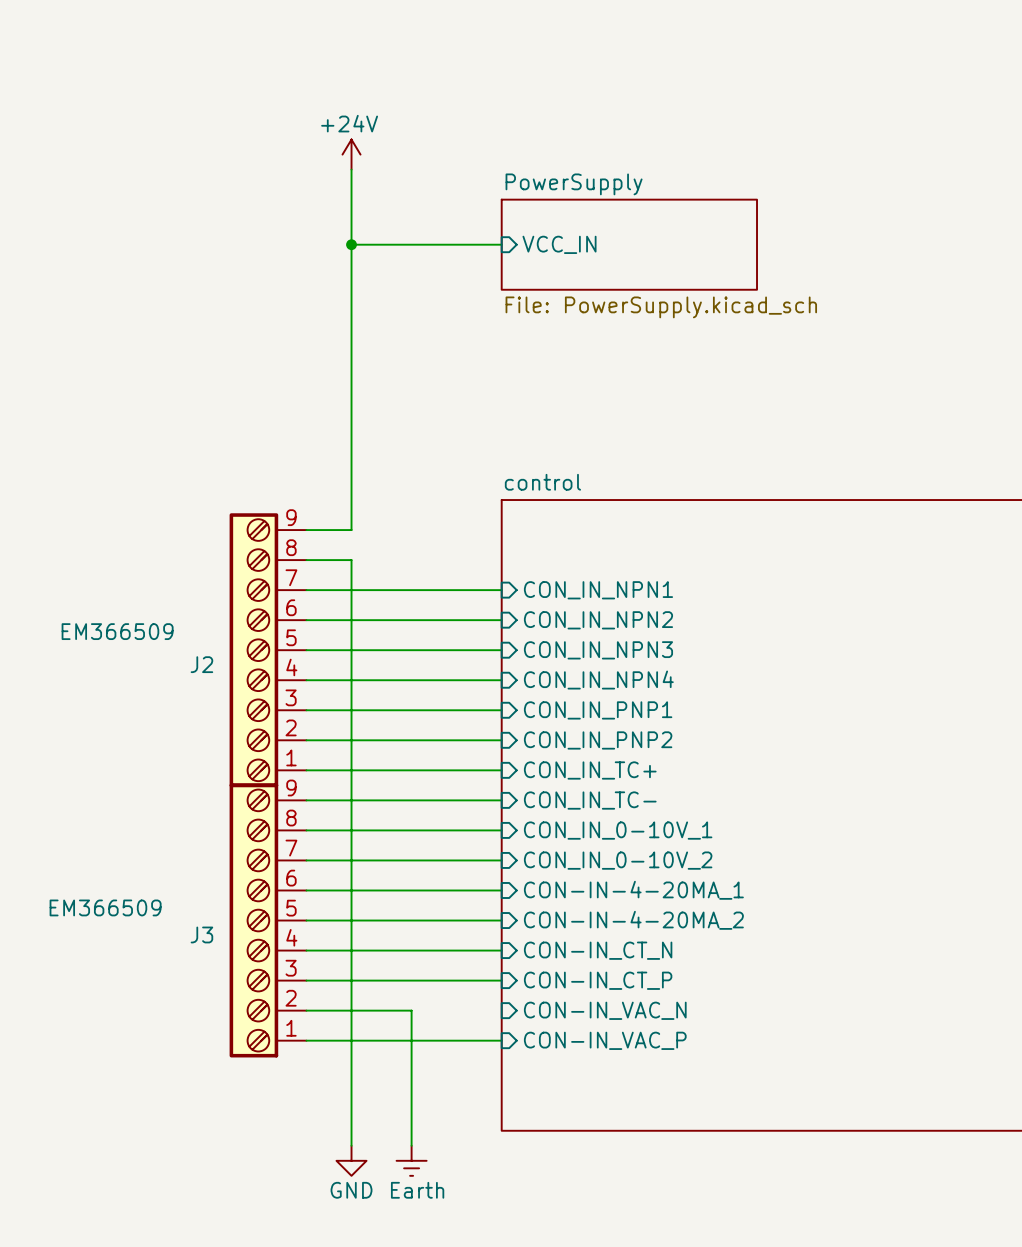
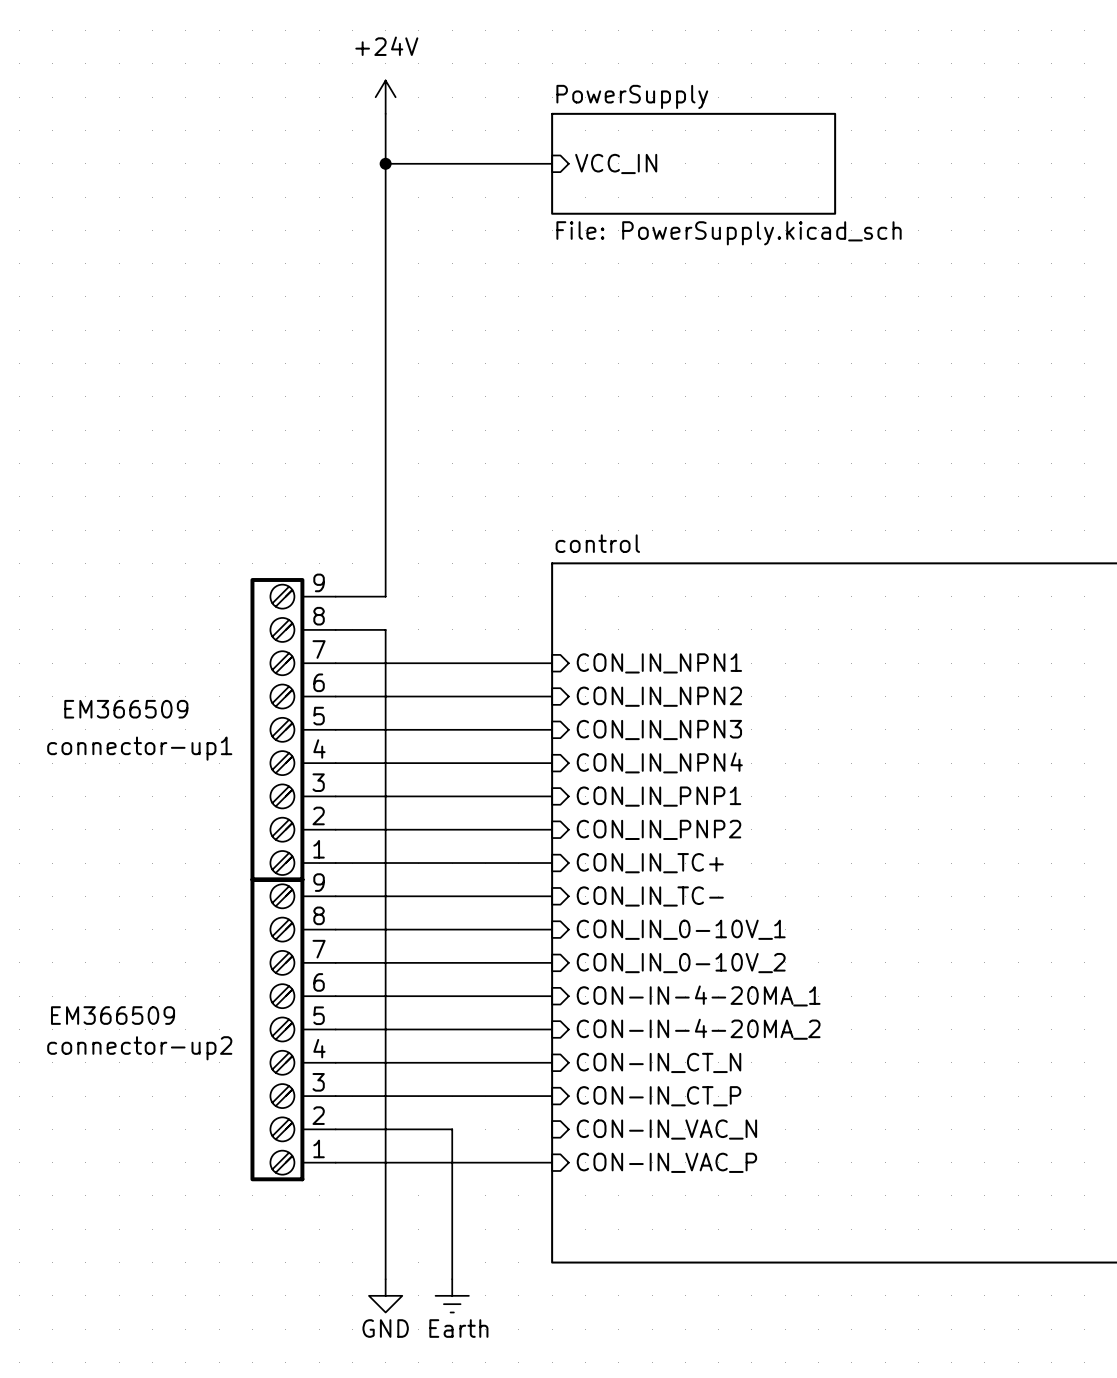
wire: none -> (385, 113) (385, 197)
power symbol text position: +24V (349, 123) -> +24V (386, 46)
junction: none -> (385, 163)
power symbol position: +24V (351, 154) -> +24V (385, 97)
wire: (351, 244) (501, 244) -> (385, 163) (552, 163)
junction: (351, 244) -> none
sheet pin position: VCC_IN (559, 244) -> VCC_IN (616, 163)
sheet PowerSupply position: (629, 244) -> (693, 163)
J2 name: J2 (201, 664) -> connector-up1 (139, 748)
J3 name: J3 (201, 934) -> connector-up2 (139, 1048)

